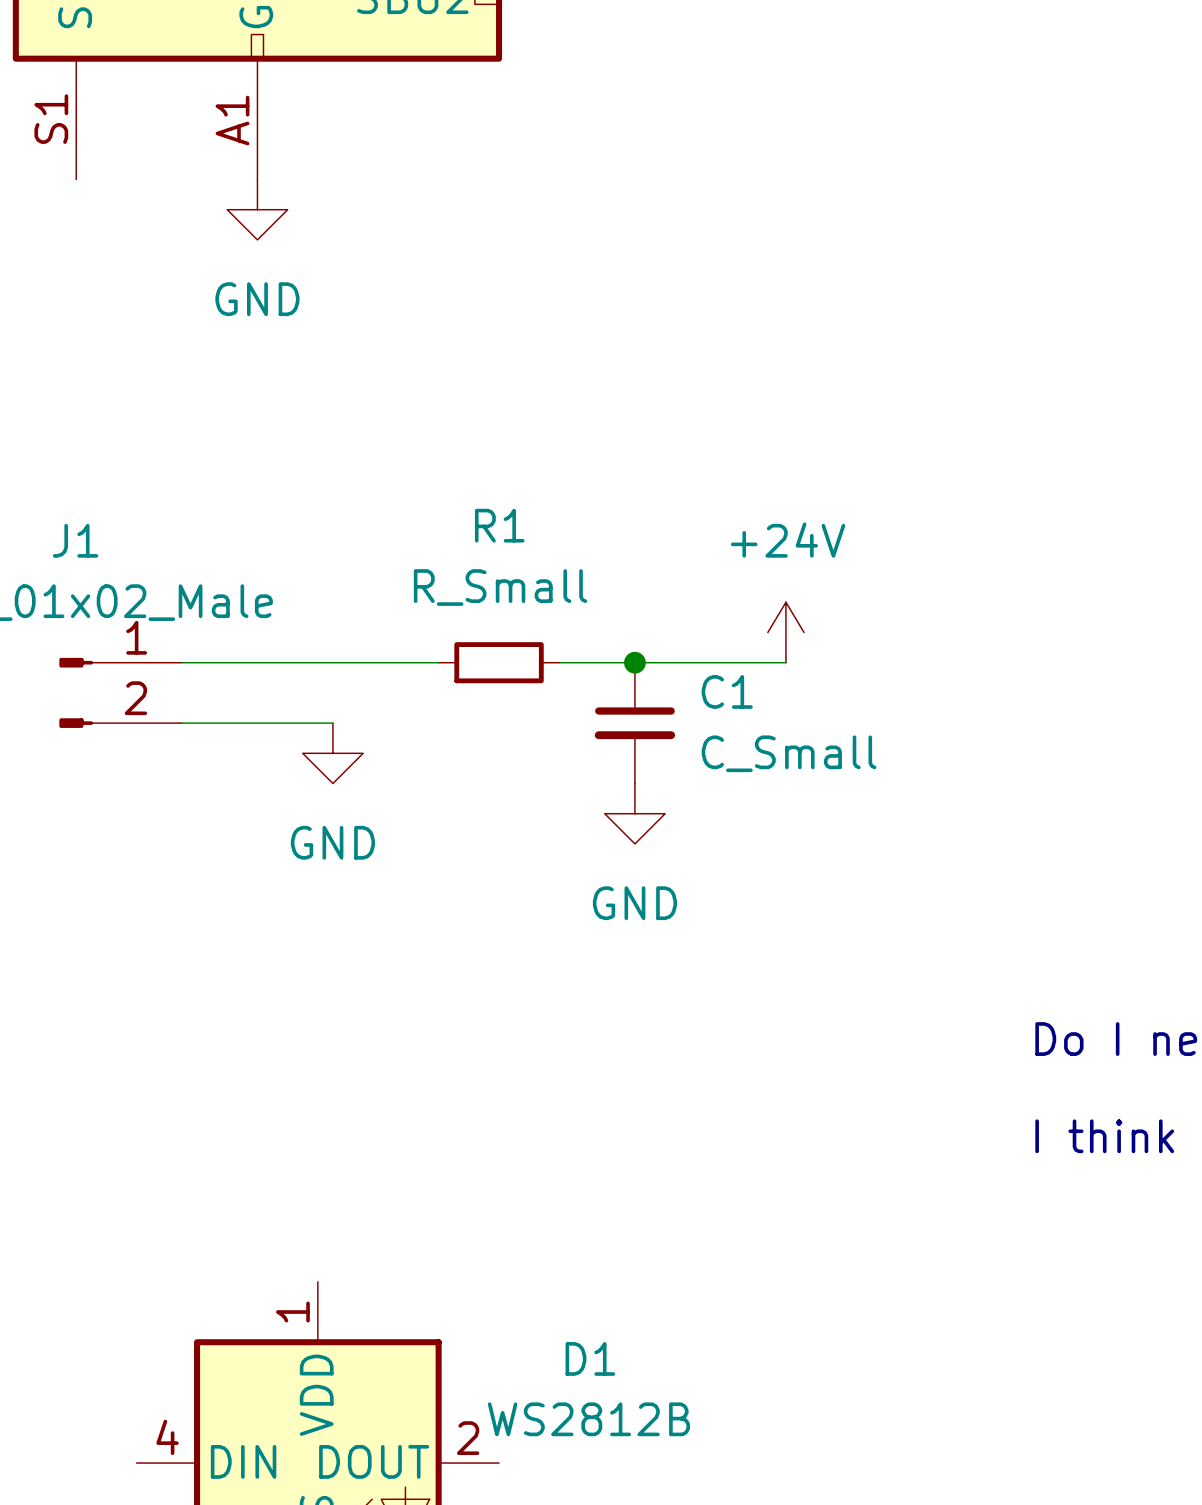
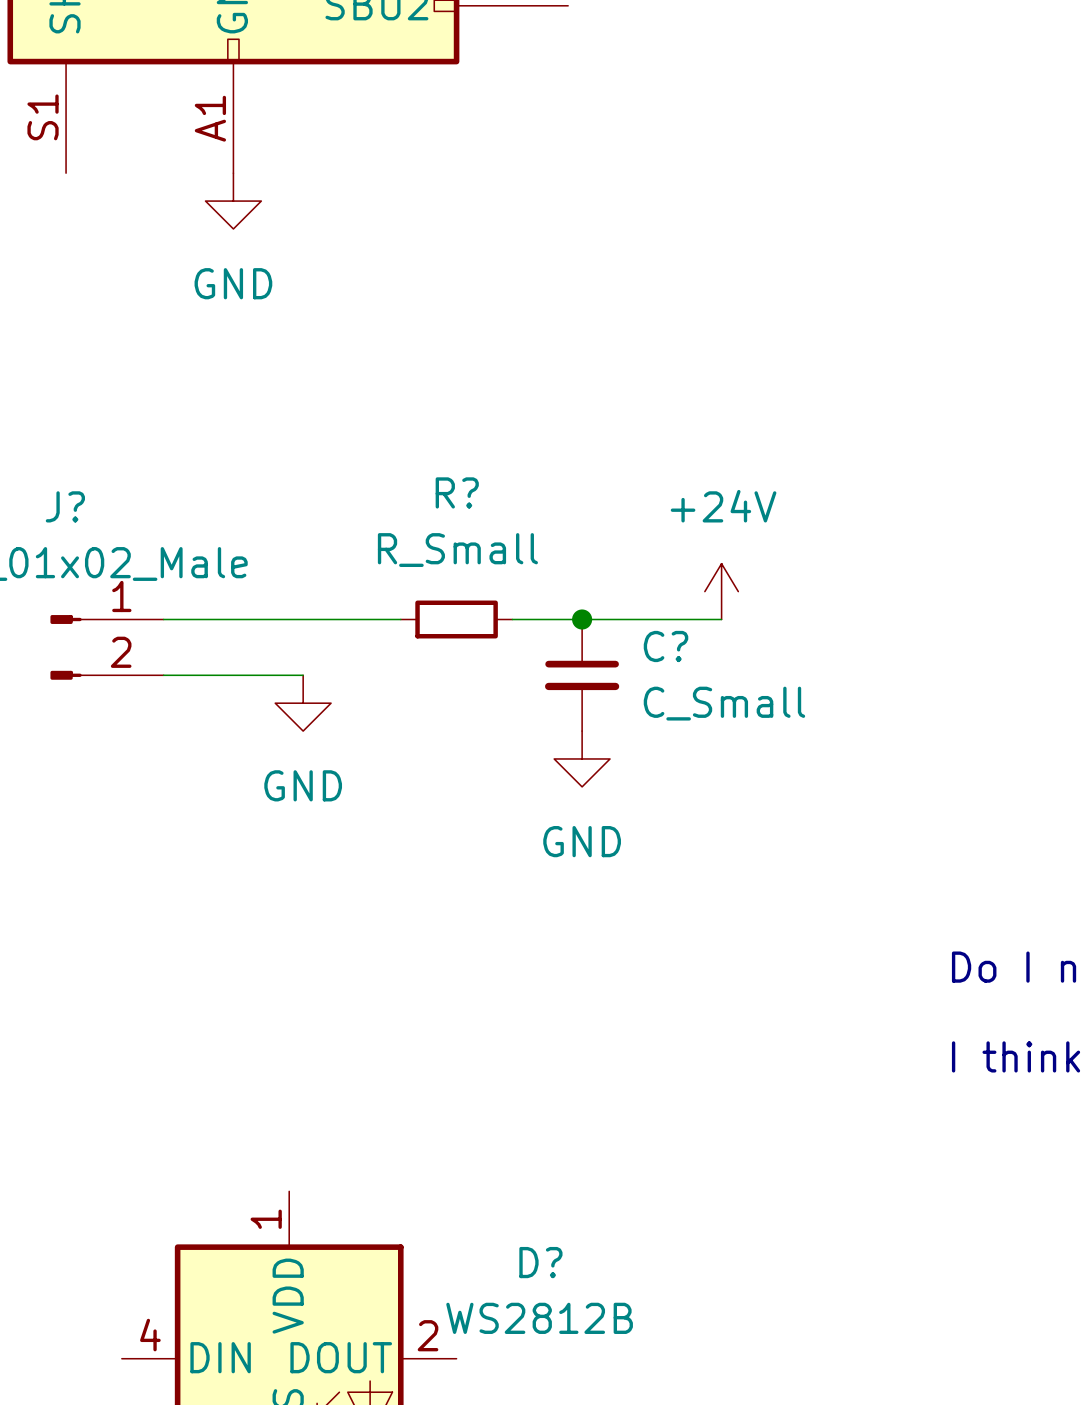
R1 name: R1 (499, 525) -> R? (457, 492)
J1 name: J1 (75, 540) -> J? (65, 506)
C1 name: C1 (727, 691) -> C? (666, 646)
D1 name: D1 (590, 1358) -> D? (540, 1262)

